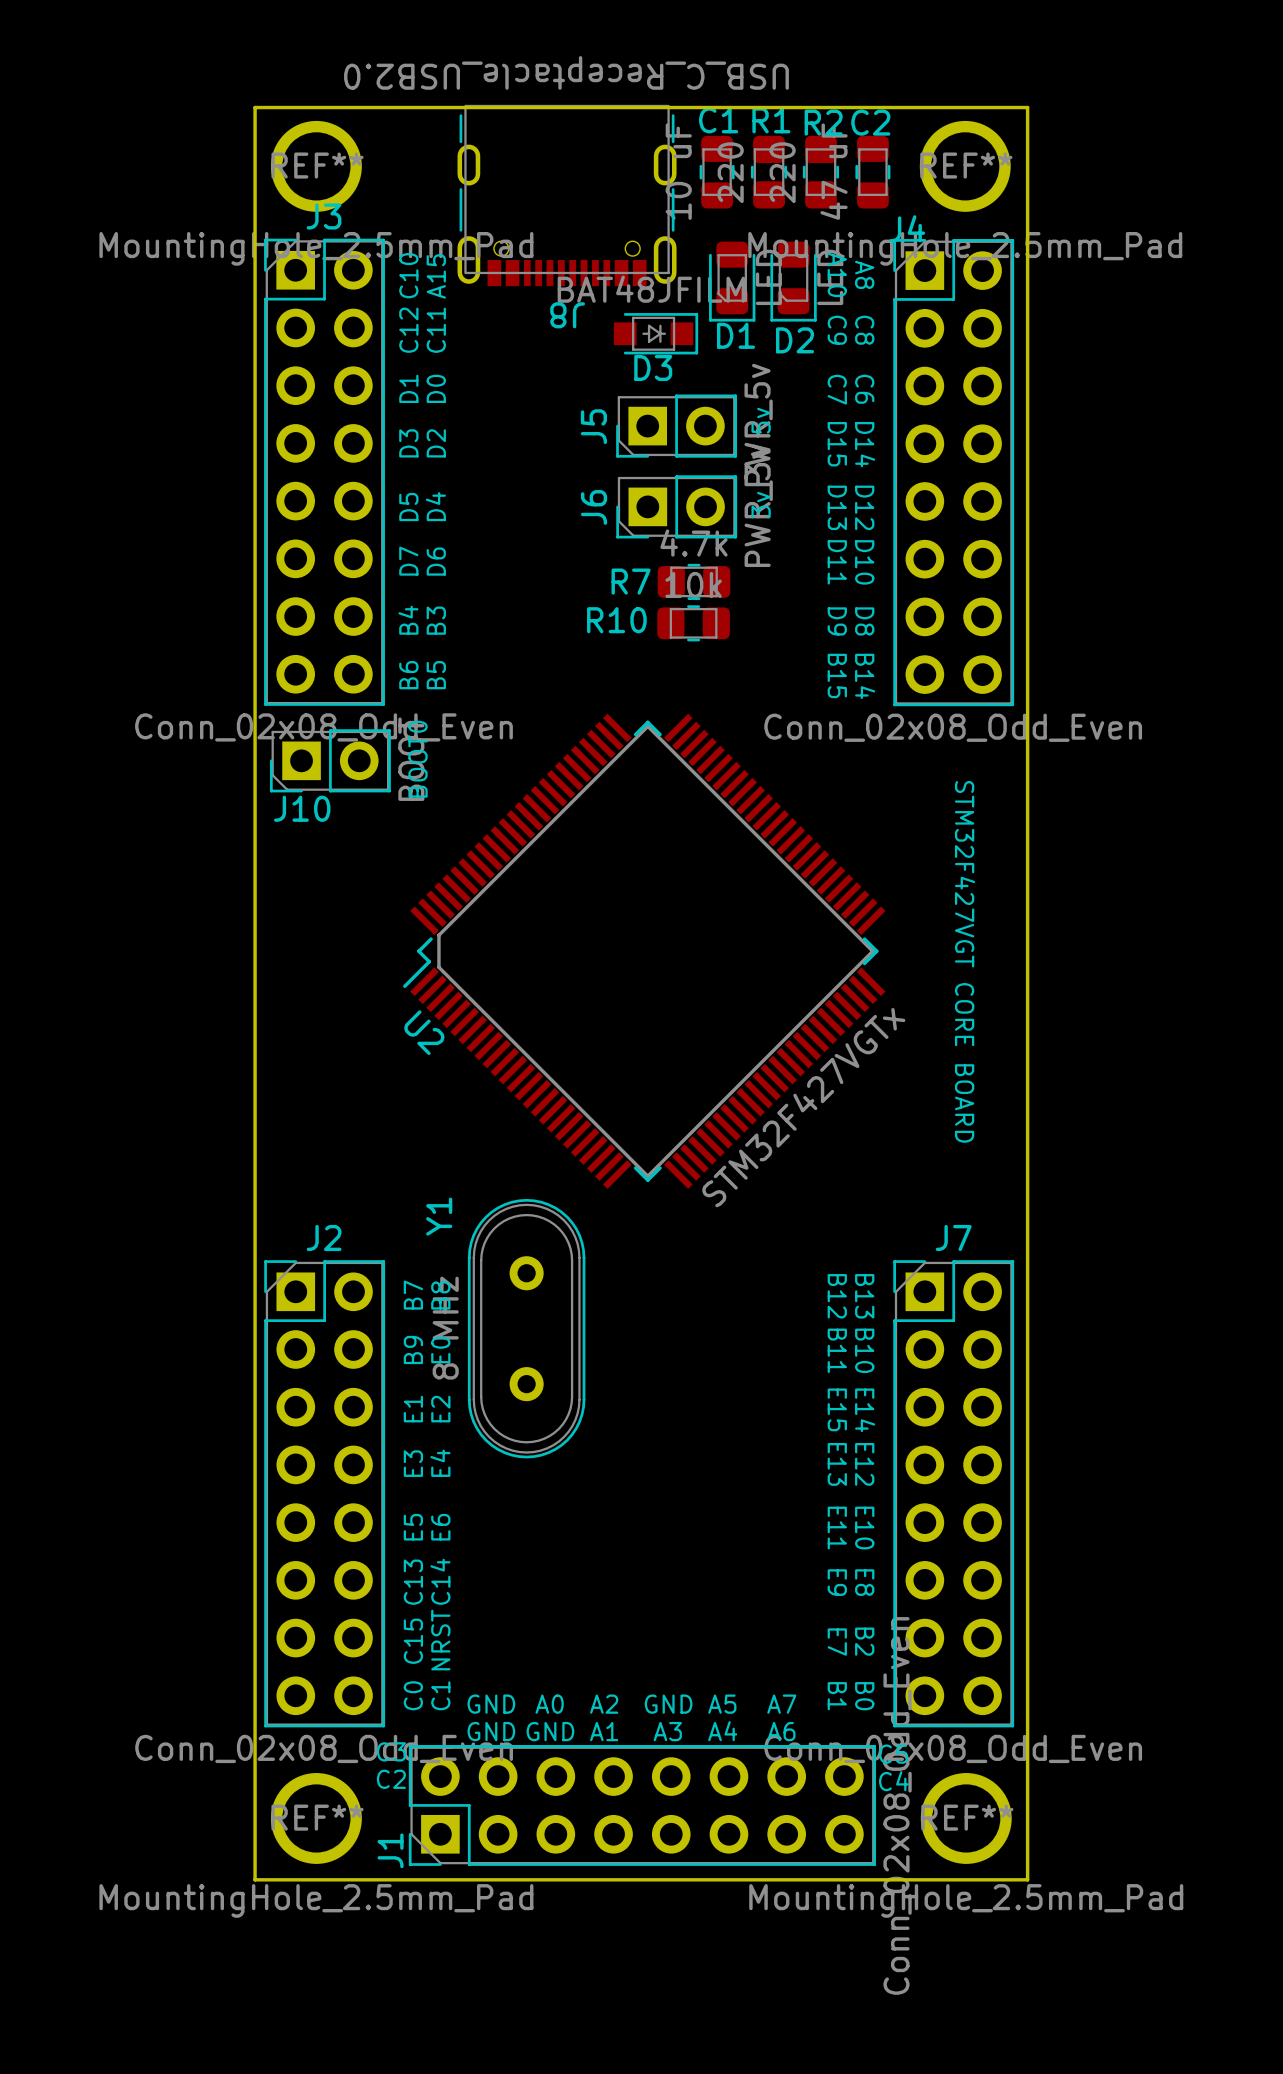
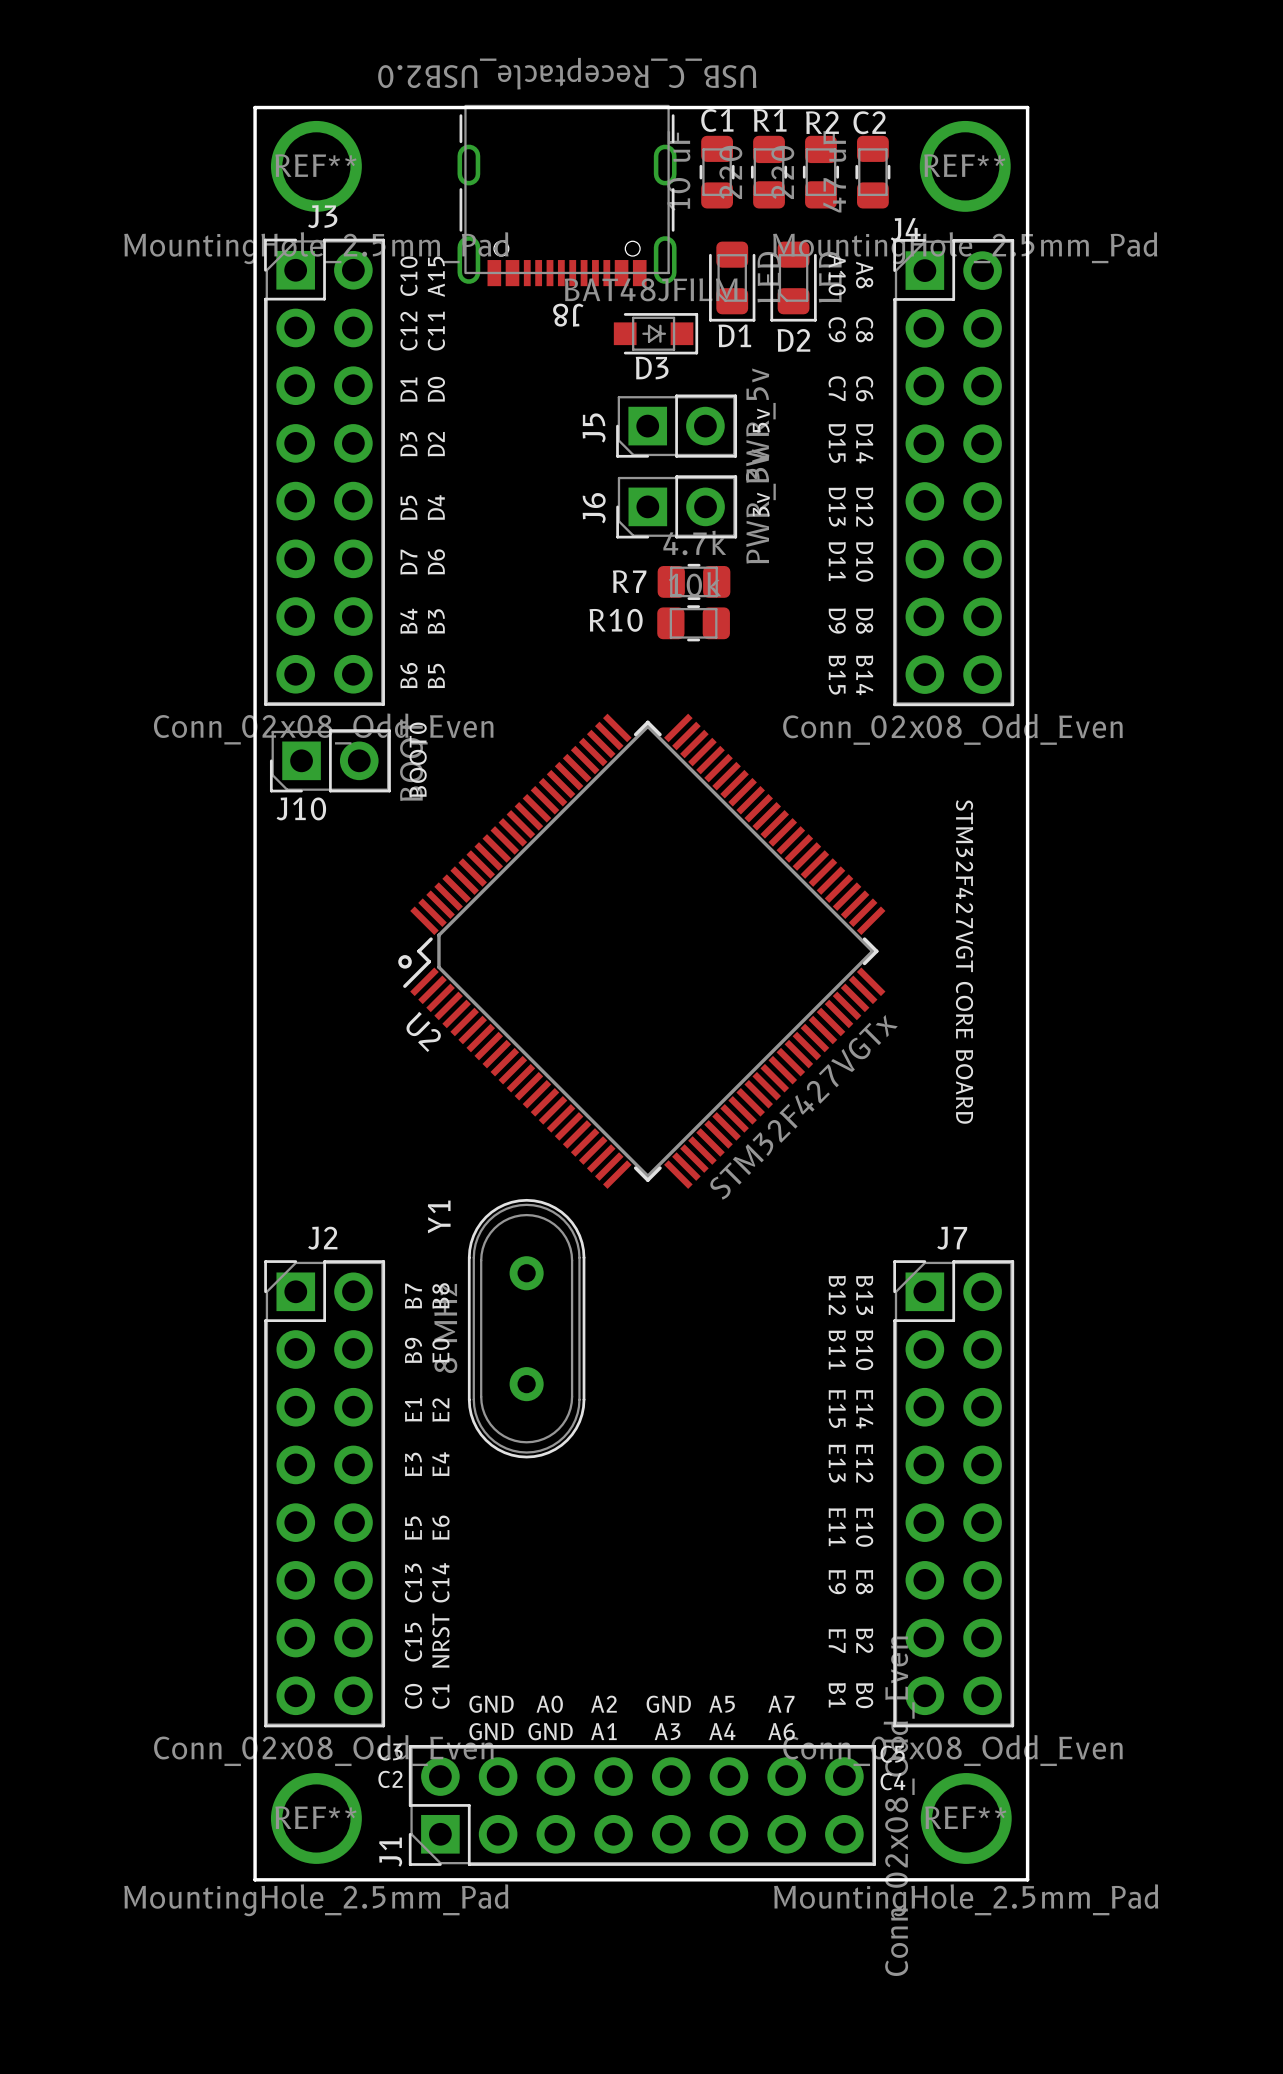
drawing: none -> [398, 955, 412, 969]

